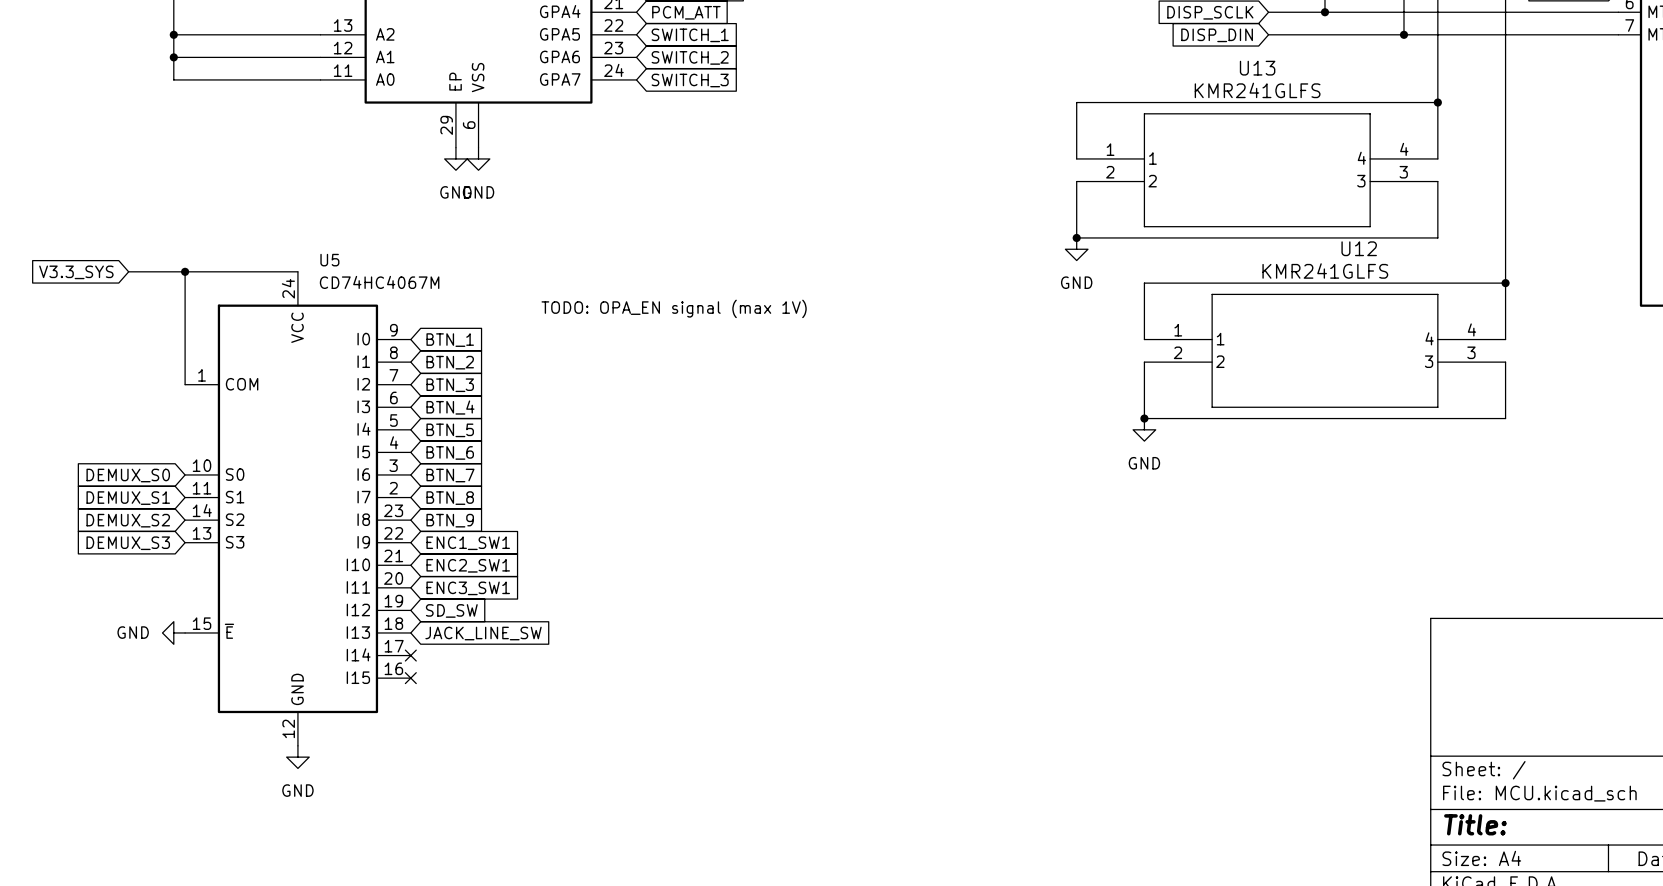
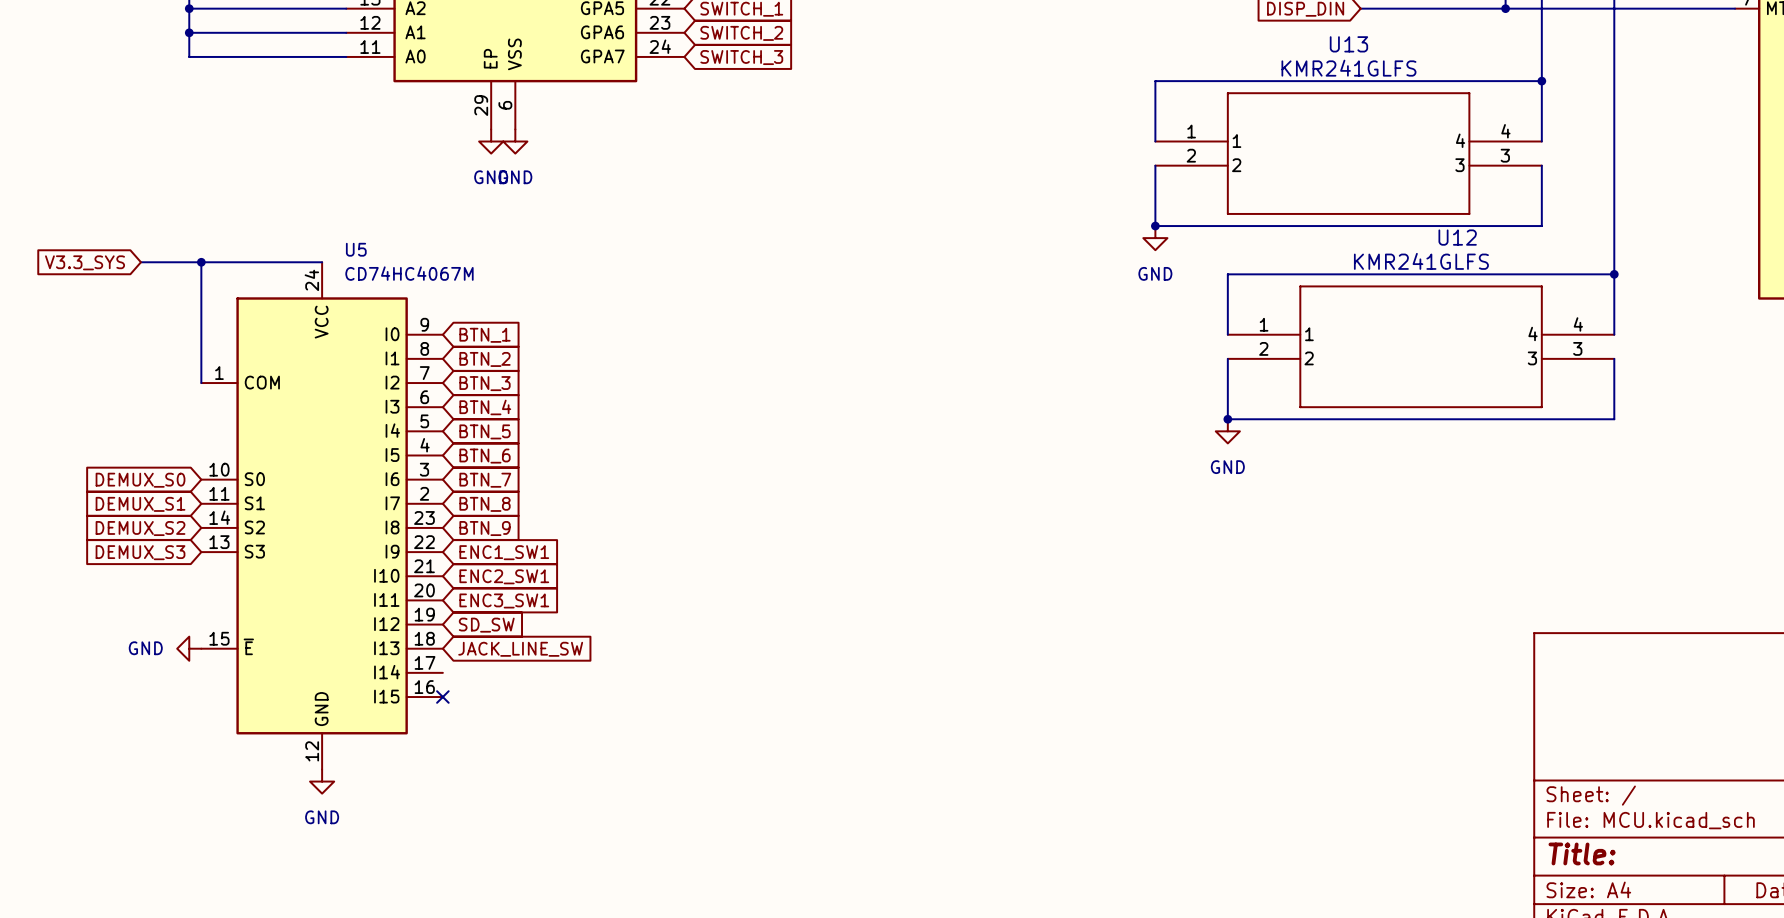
text: TODO: OPA_EN signal (max 1V) (674, 308) -> none
no-connect mark: (410, 655) -> none

